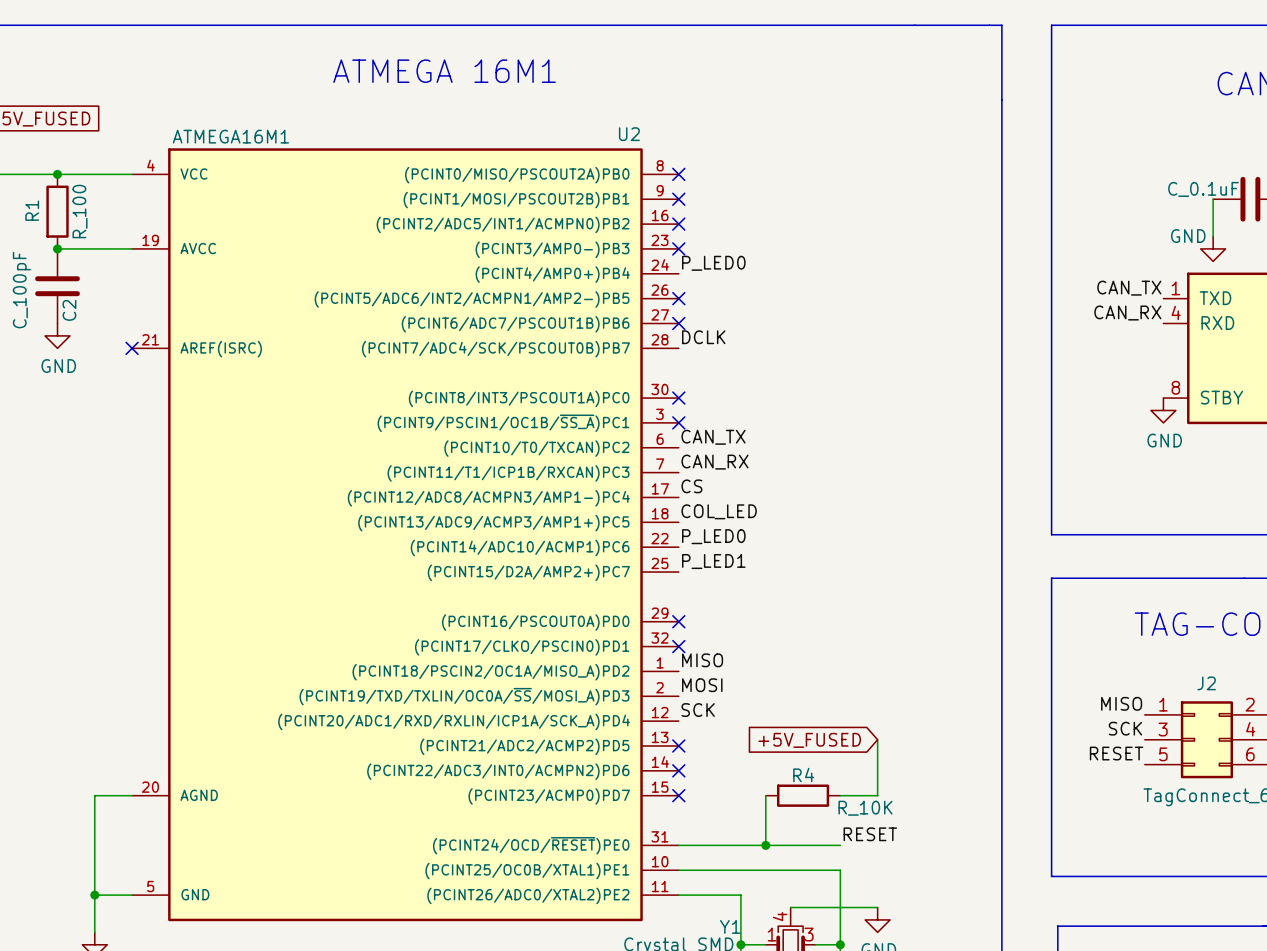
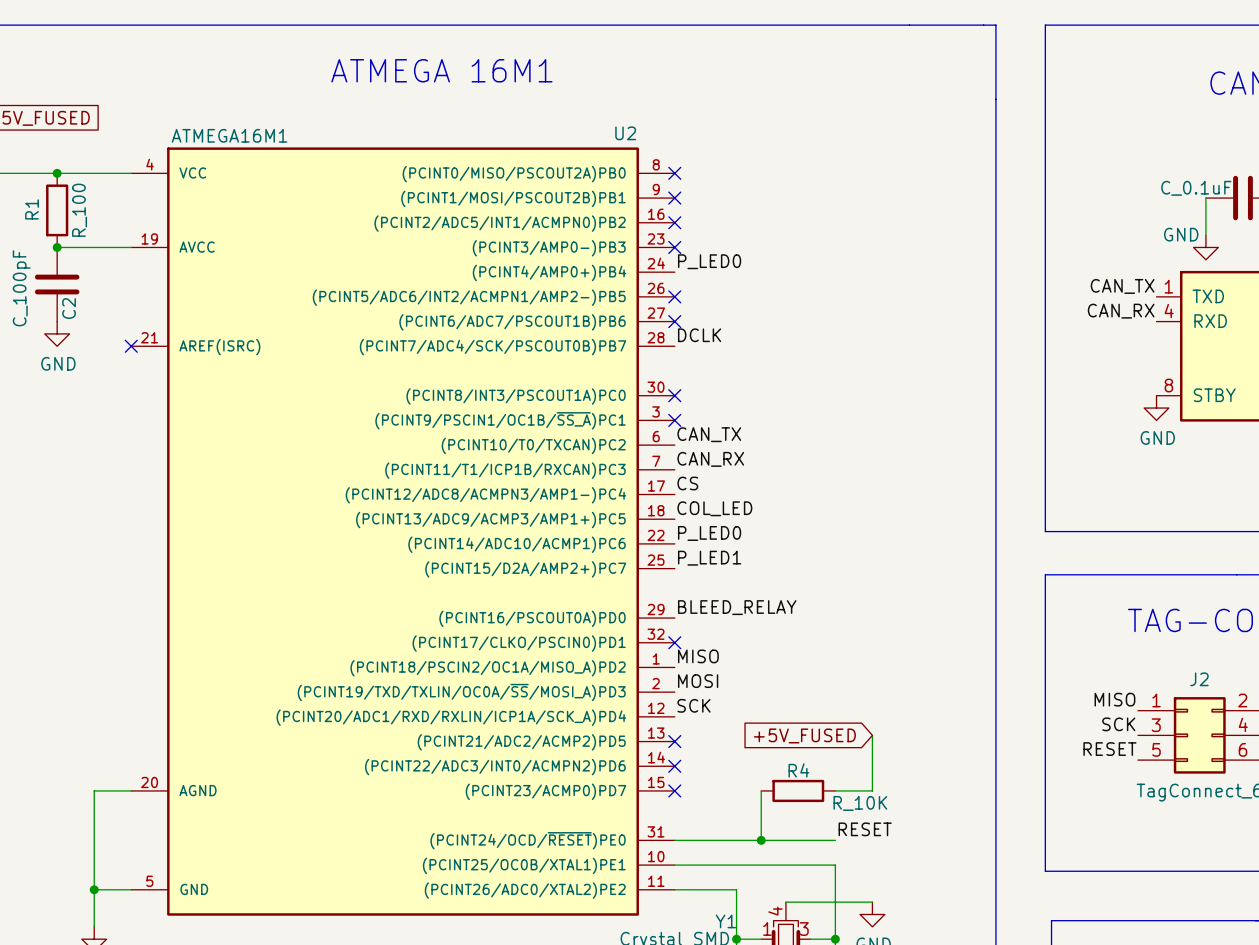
label: none -> BLEED_RELAY (737, 607)
no-connect mark: (678, 621) -> none

